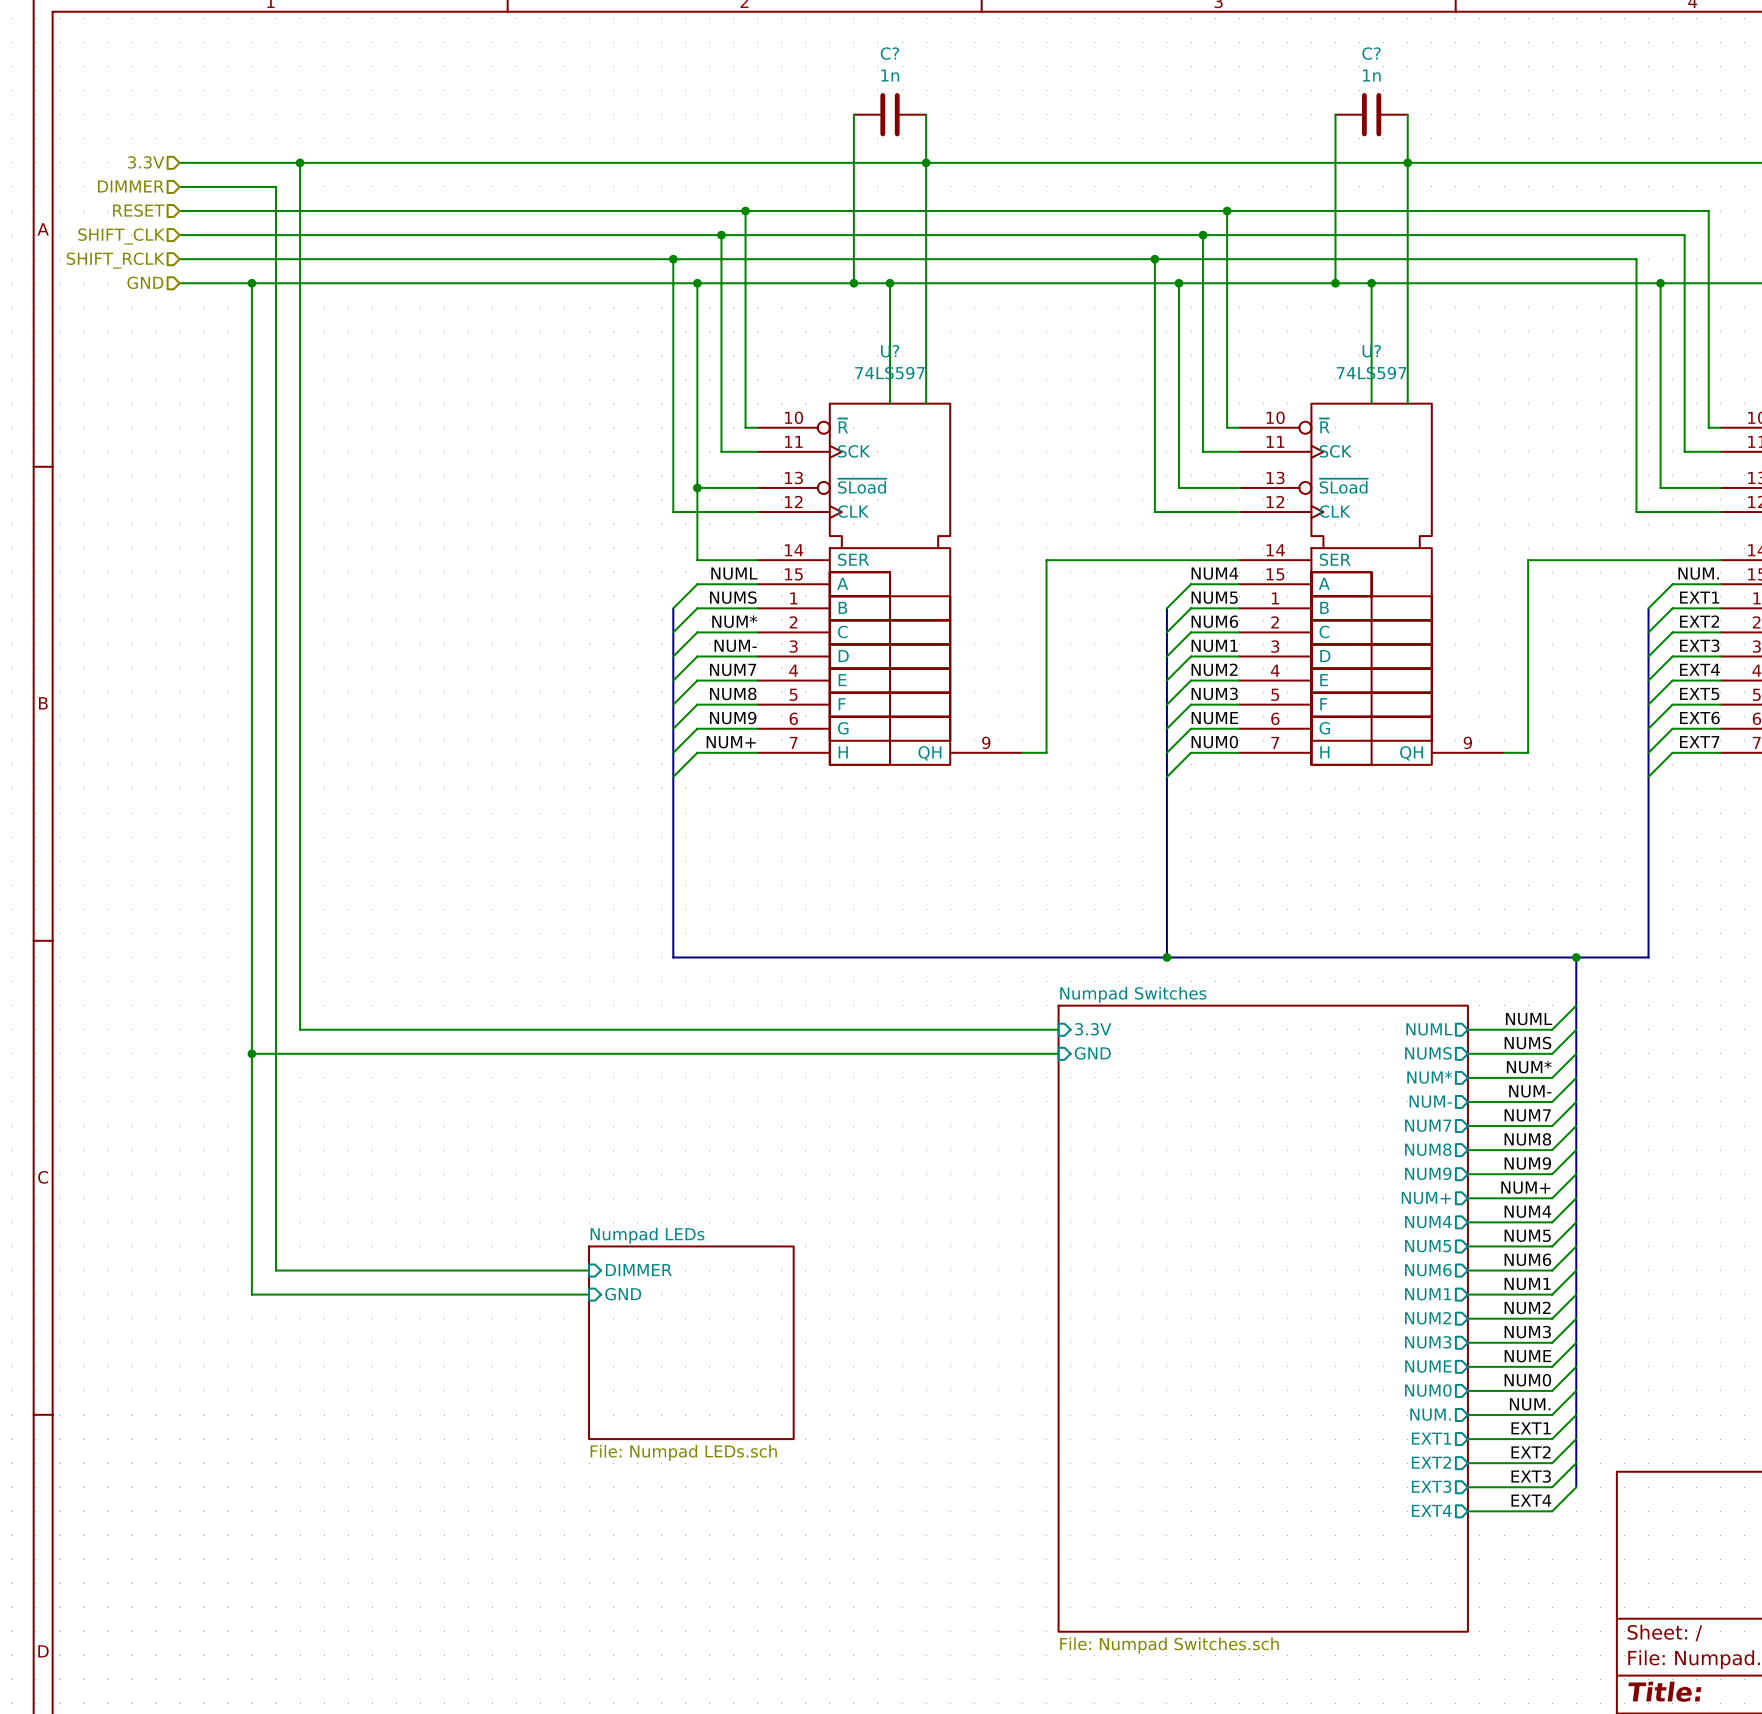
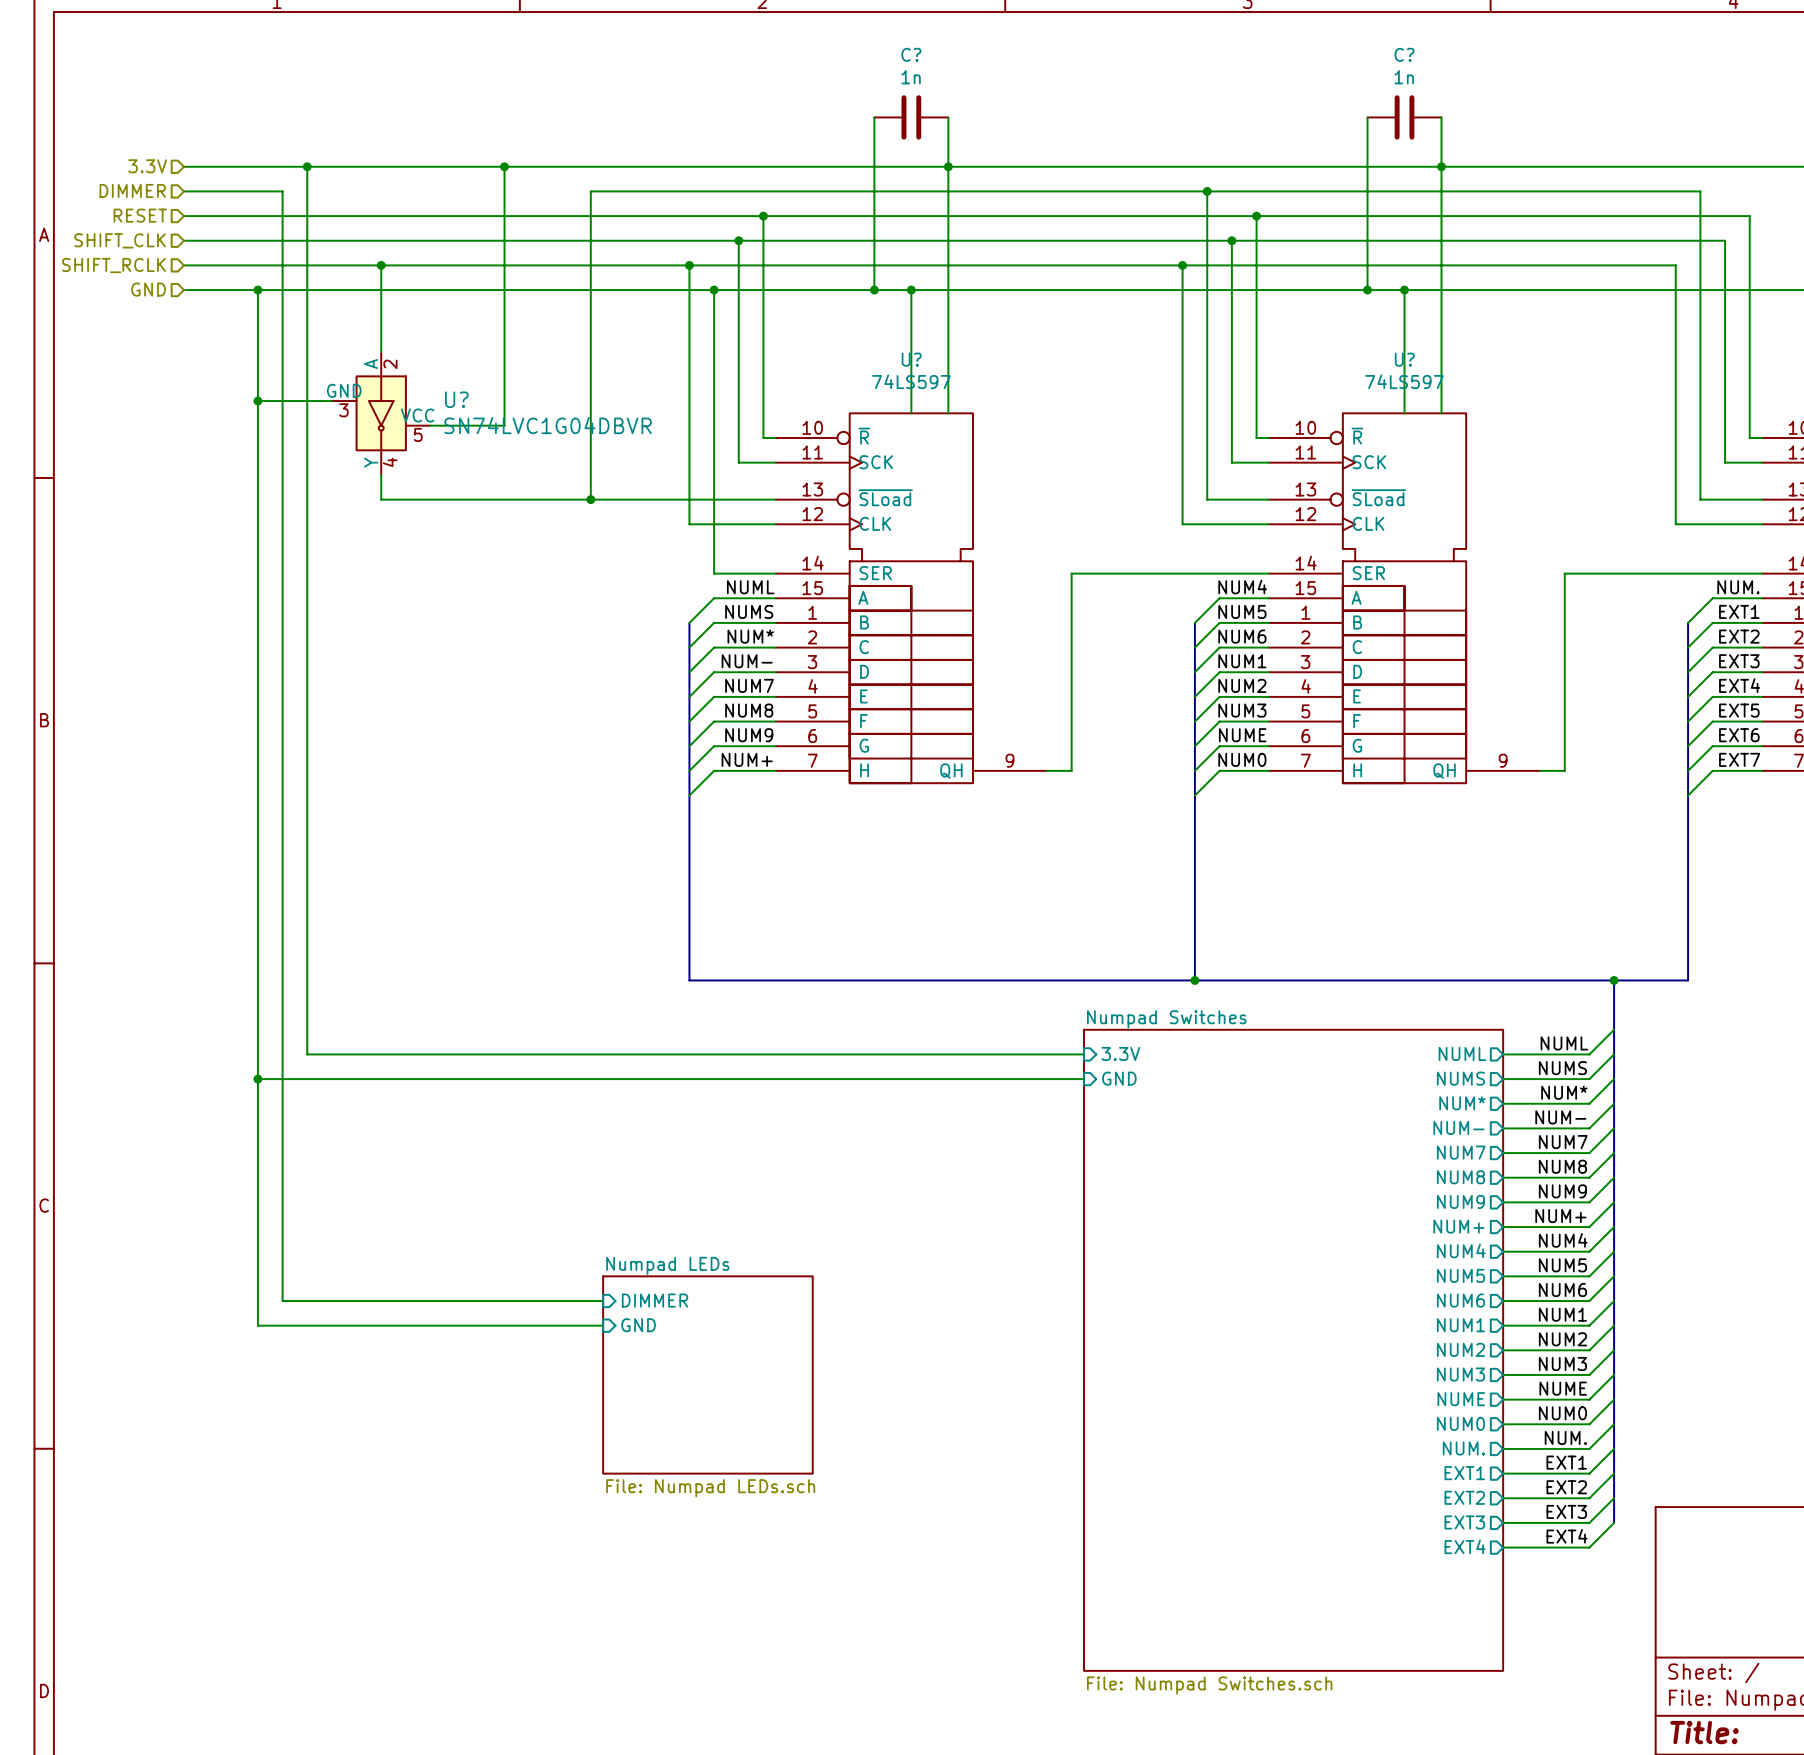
wire: none -> (504, 166) (504, 425) (430, 425)
junction: none -> (504, 166)
wire: none -> (1207, 191) (1207, 290)
junction: none -> (1207, 191)
wire: none -> (381, 265) (381, 351)
junction: none -> (381, 265)
junction: (1178, 283) -> none
wire: none -> (1700, 290) (1700, 191) (590, 191) (590, 499)
junction: (1660, 283) -> none
wire: none -> (257, 401) (331, 401)
junction: none -> (257, 401)
U?: none -> SN74LVC1G04DBVR (381, 413)
wire: none -> (381, 474) (381, 499) (714, 499)
junction: none -> (590, 499)
junction: (697, 487) -> none

